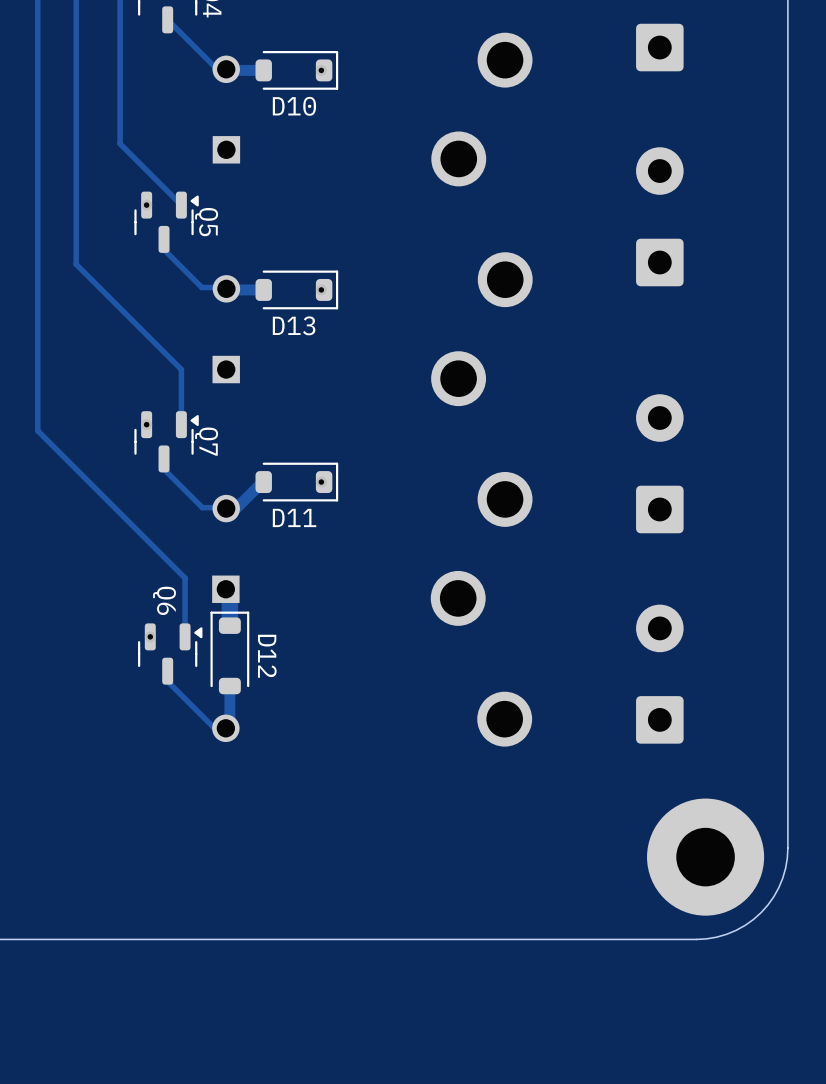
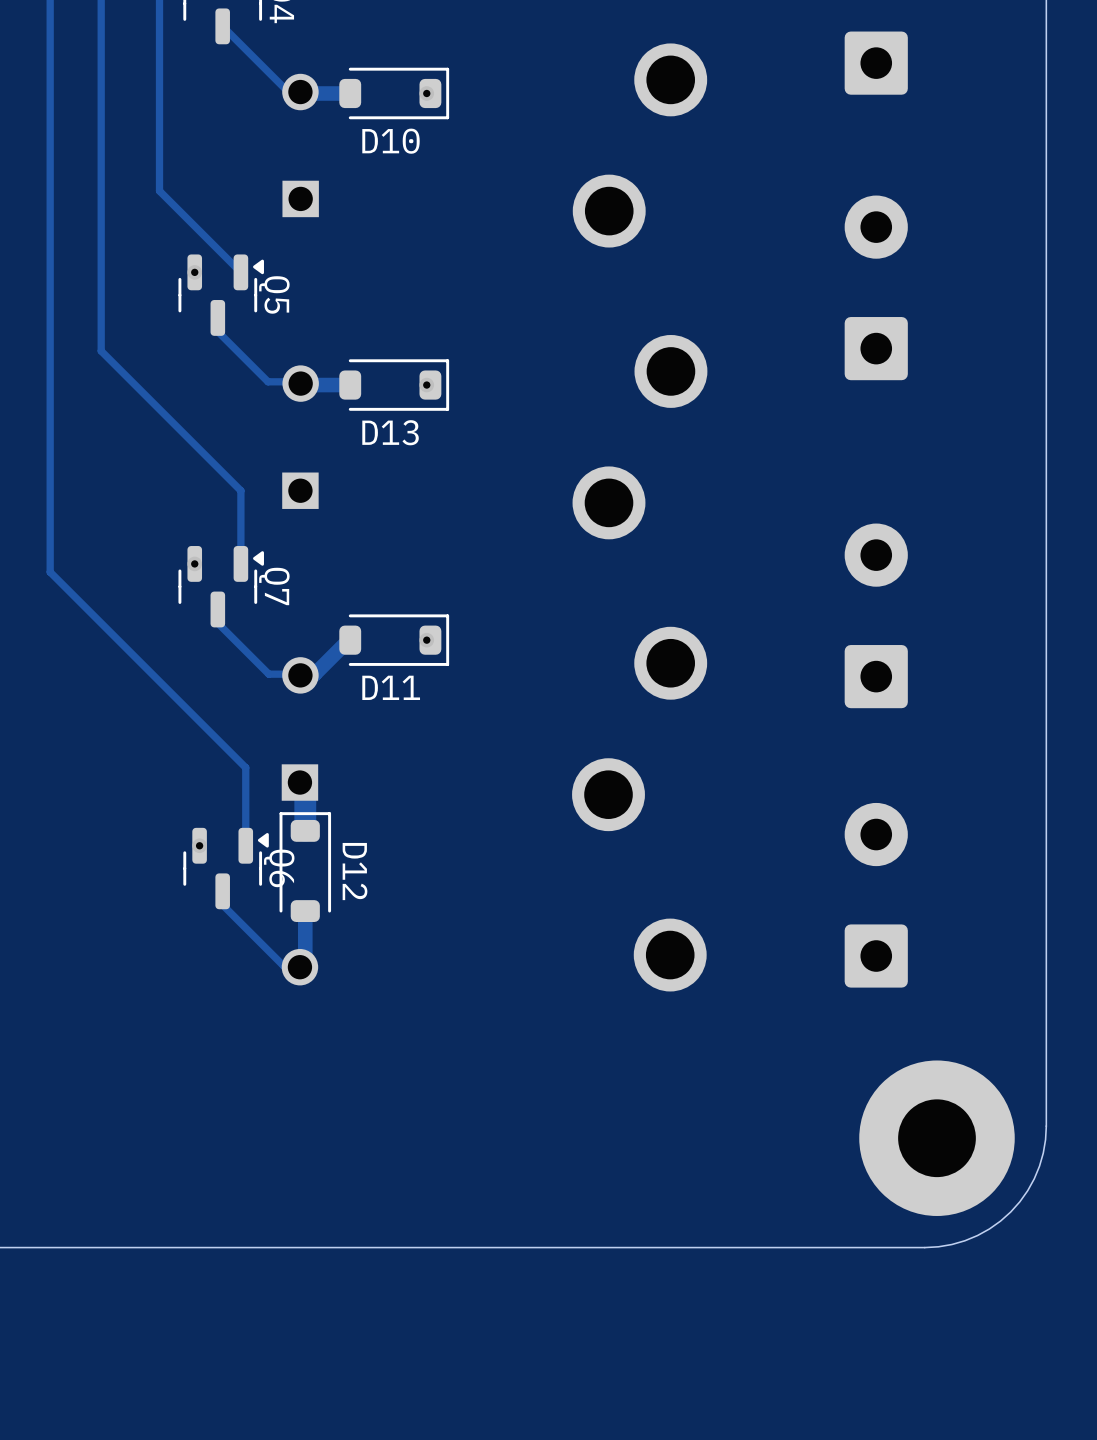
Q6 name position: Q6 (164, 600) -> Q6 (279, 868)

